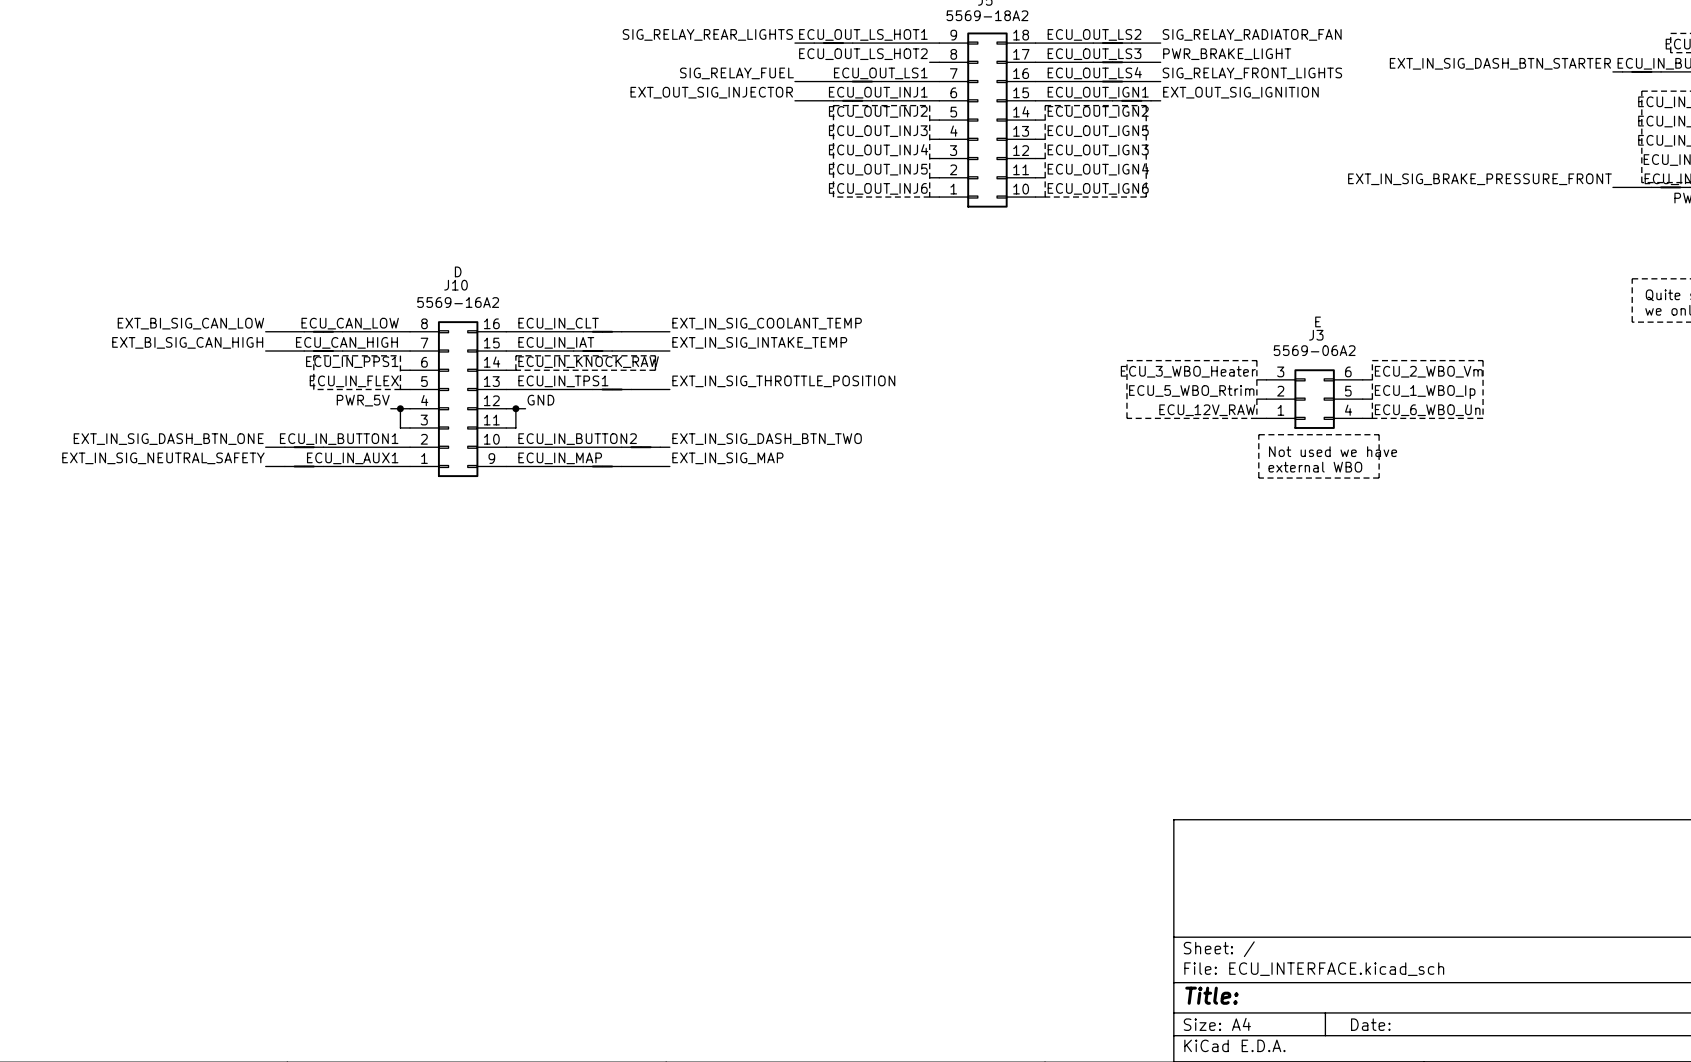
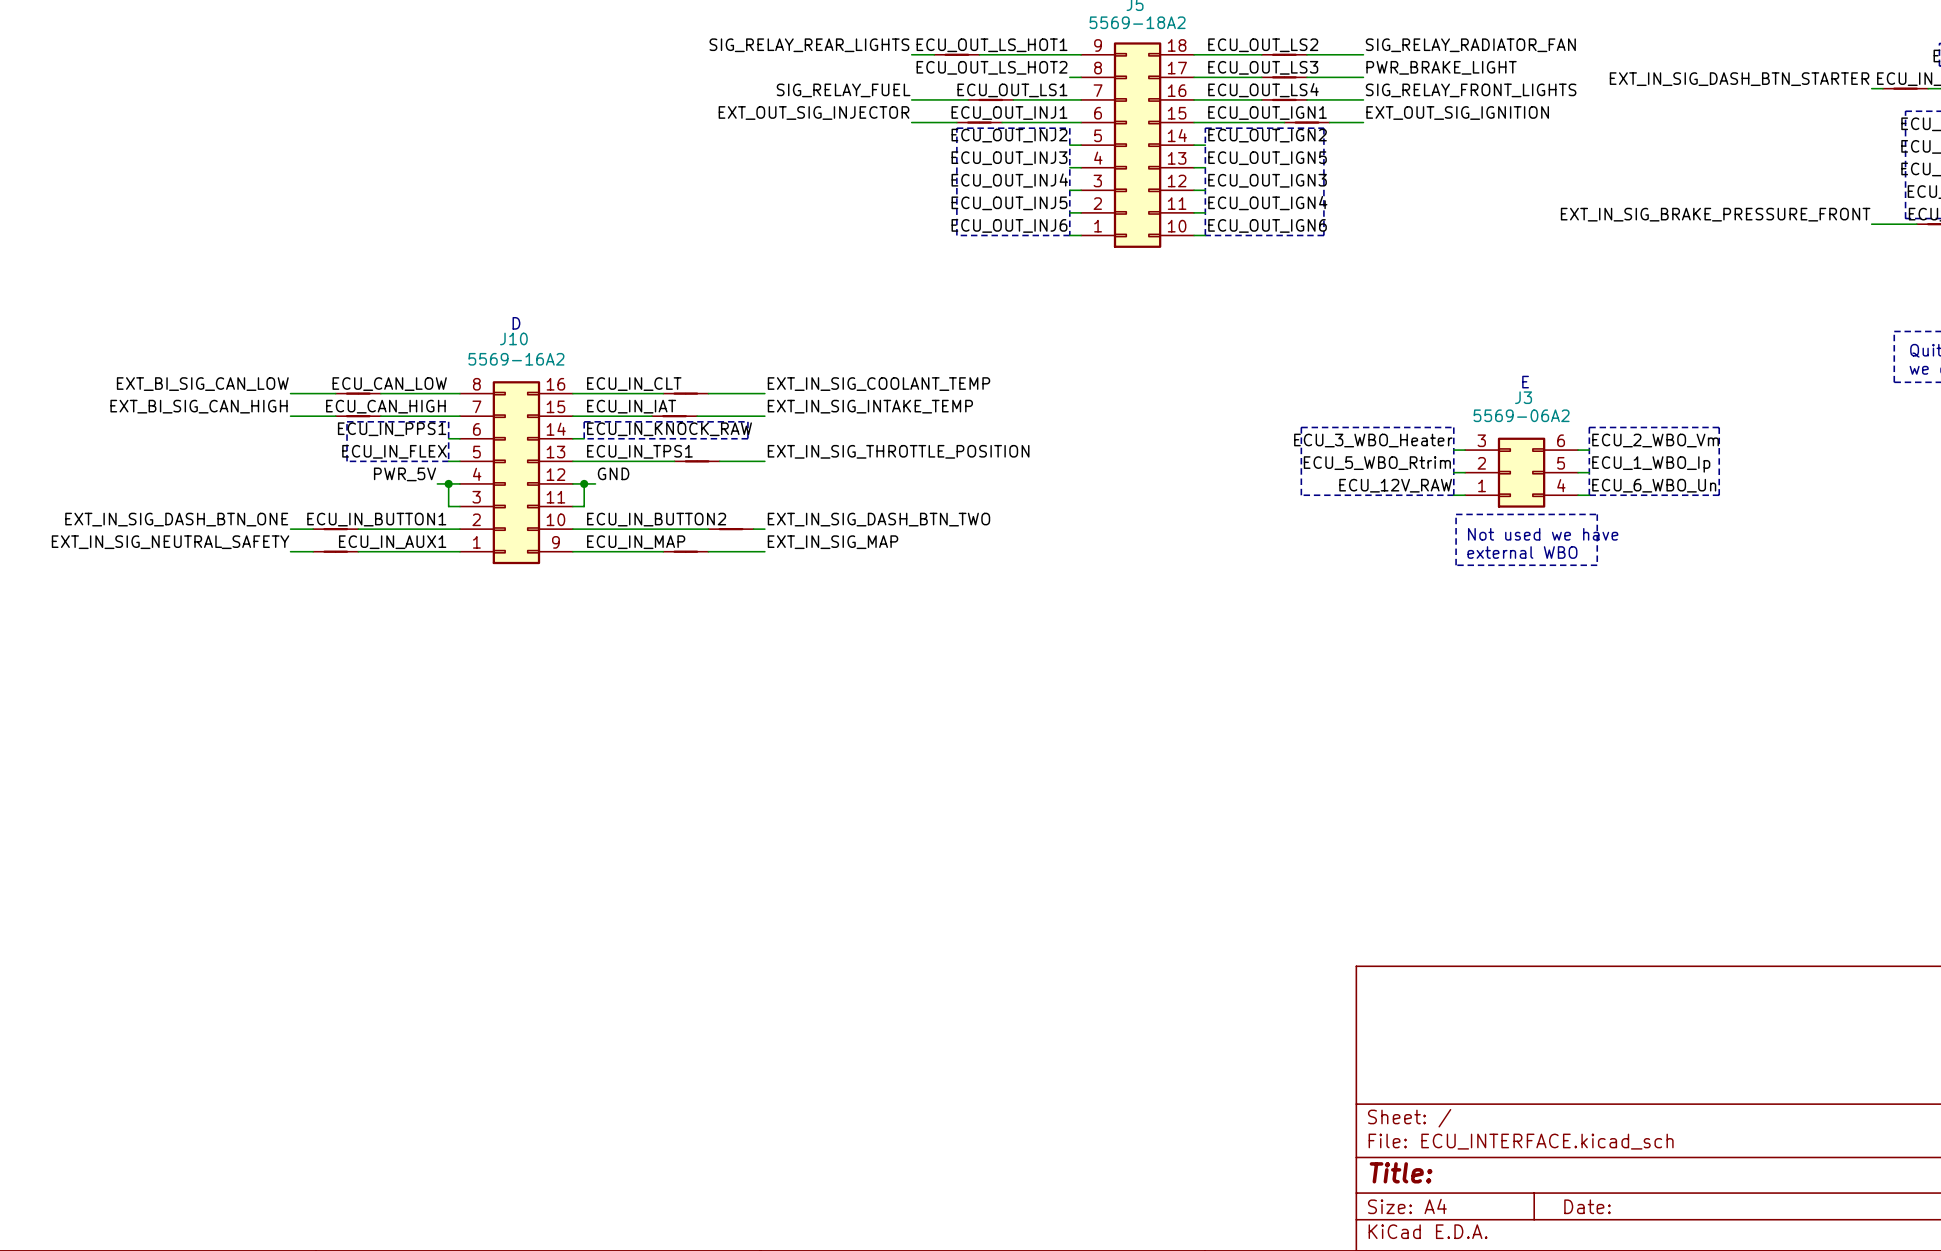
label position: SIG_RELAY_RADIATOR_FAN (1252, 34) -> SIG_RELAY_RADIATOR_FAN (1470, 45)
wire: none -> (1340, 54) (1363, 54)
label position: PWR_BRAKE_LIGHT (1227, 54) -> PWR_BRAKE_LIGHT (1441, 67)
wire: none -> (1340, 77) (1363, 77)
label position: SIG_RELAY_FRONT_LIGHTS (1252, 73) -> SIG_RELAY_FRONT_LIGHTS (1471, 90)
wire: none -> (1340, 99) (1363, 99)
label position: EXT_OUT_SIG_IGNITION (1240, 92) -> EXT_OUT_SIG_IGNITION (1457, 113)
wire: none -> (1340, 122) (1363, 122)

